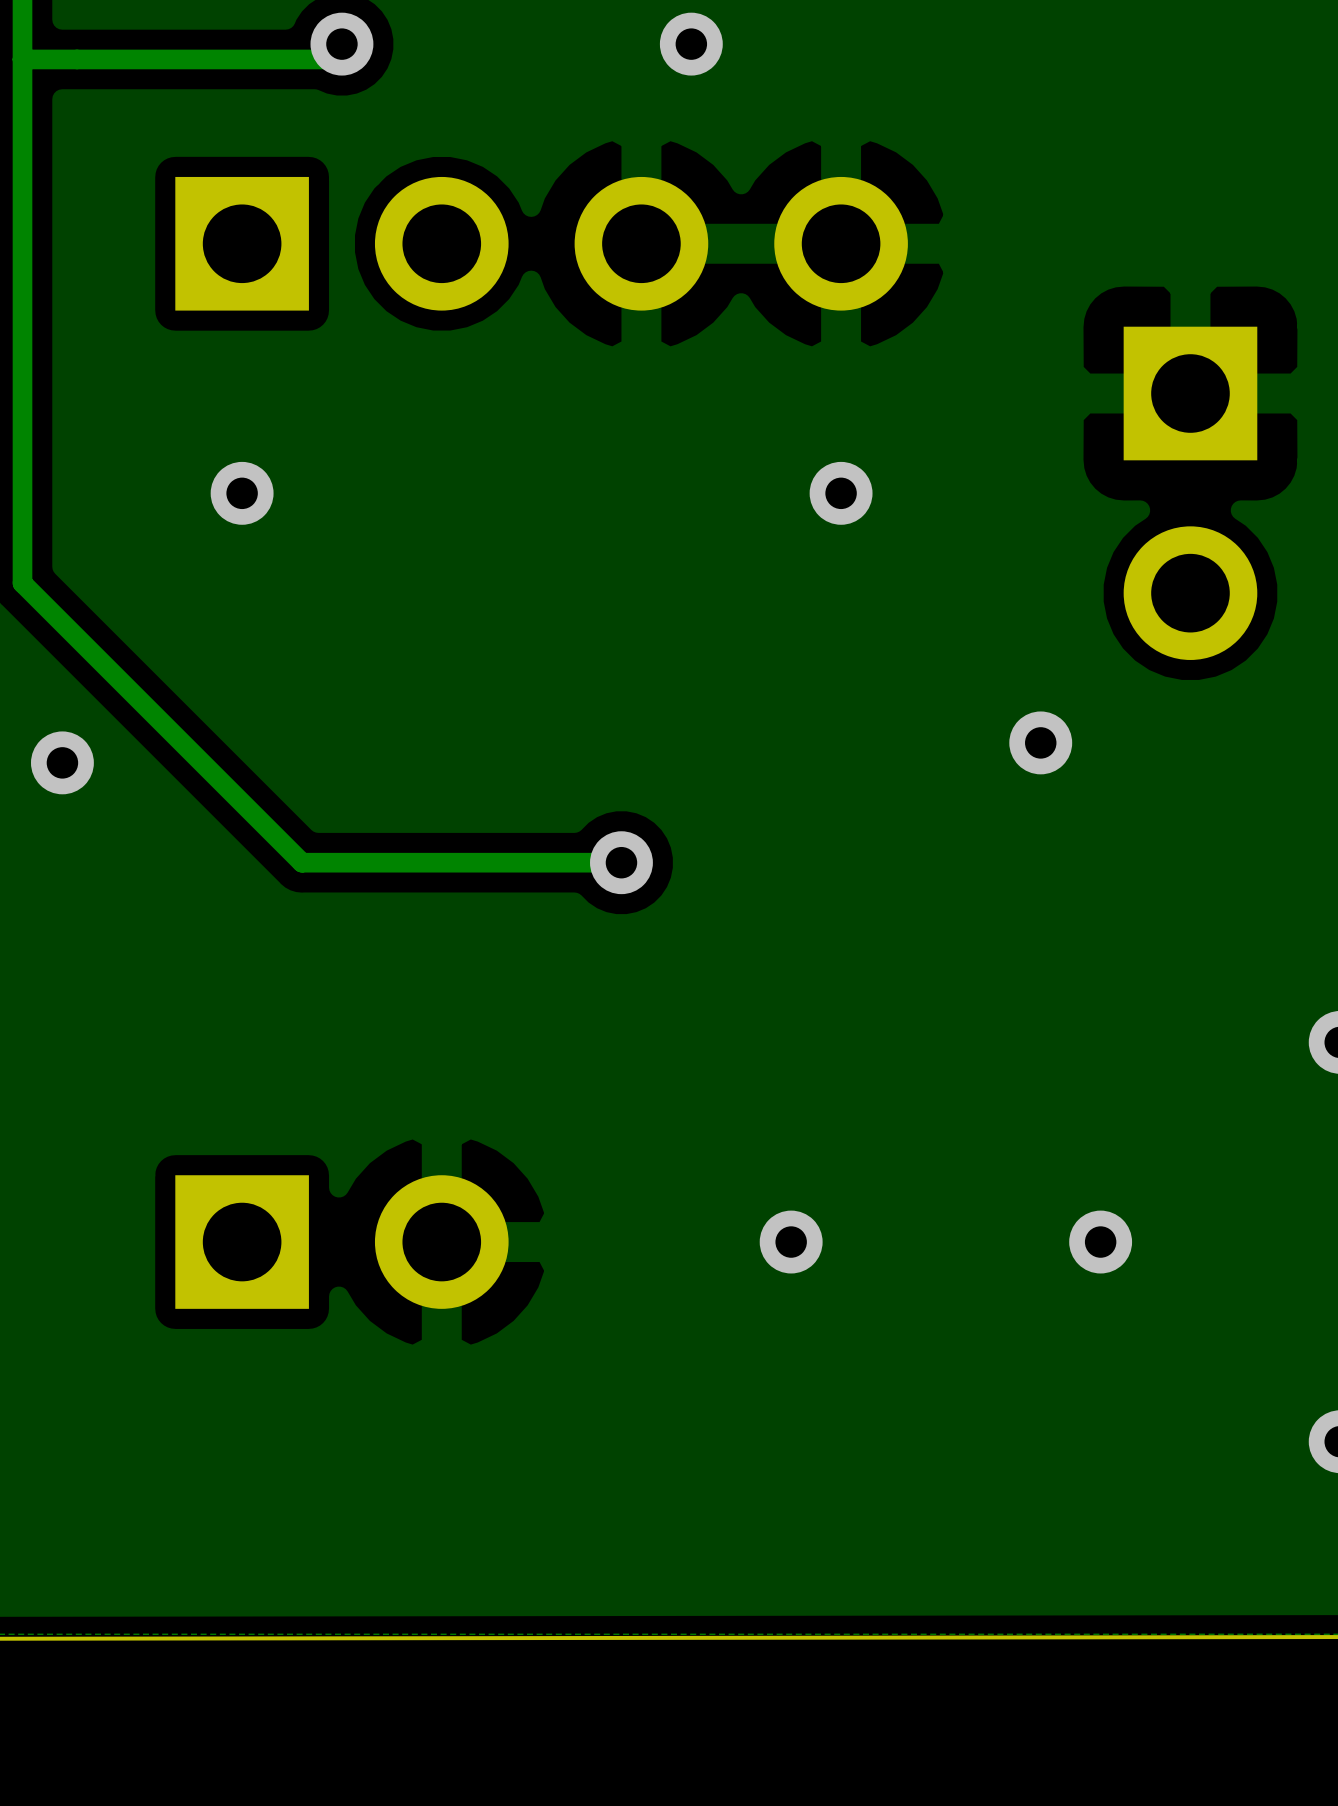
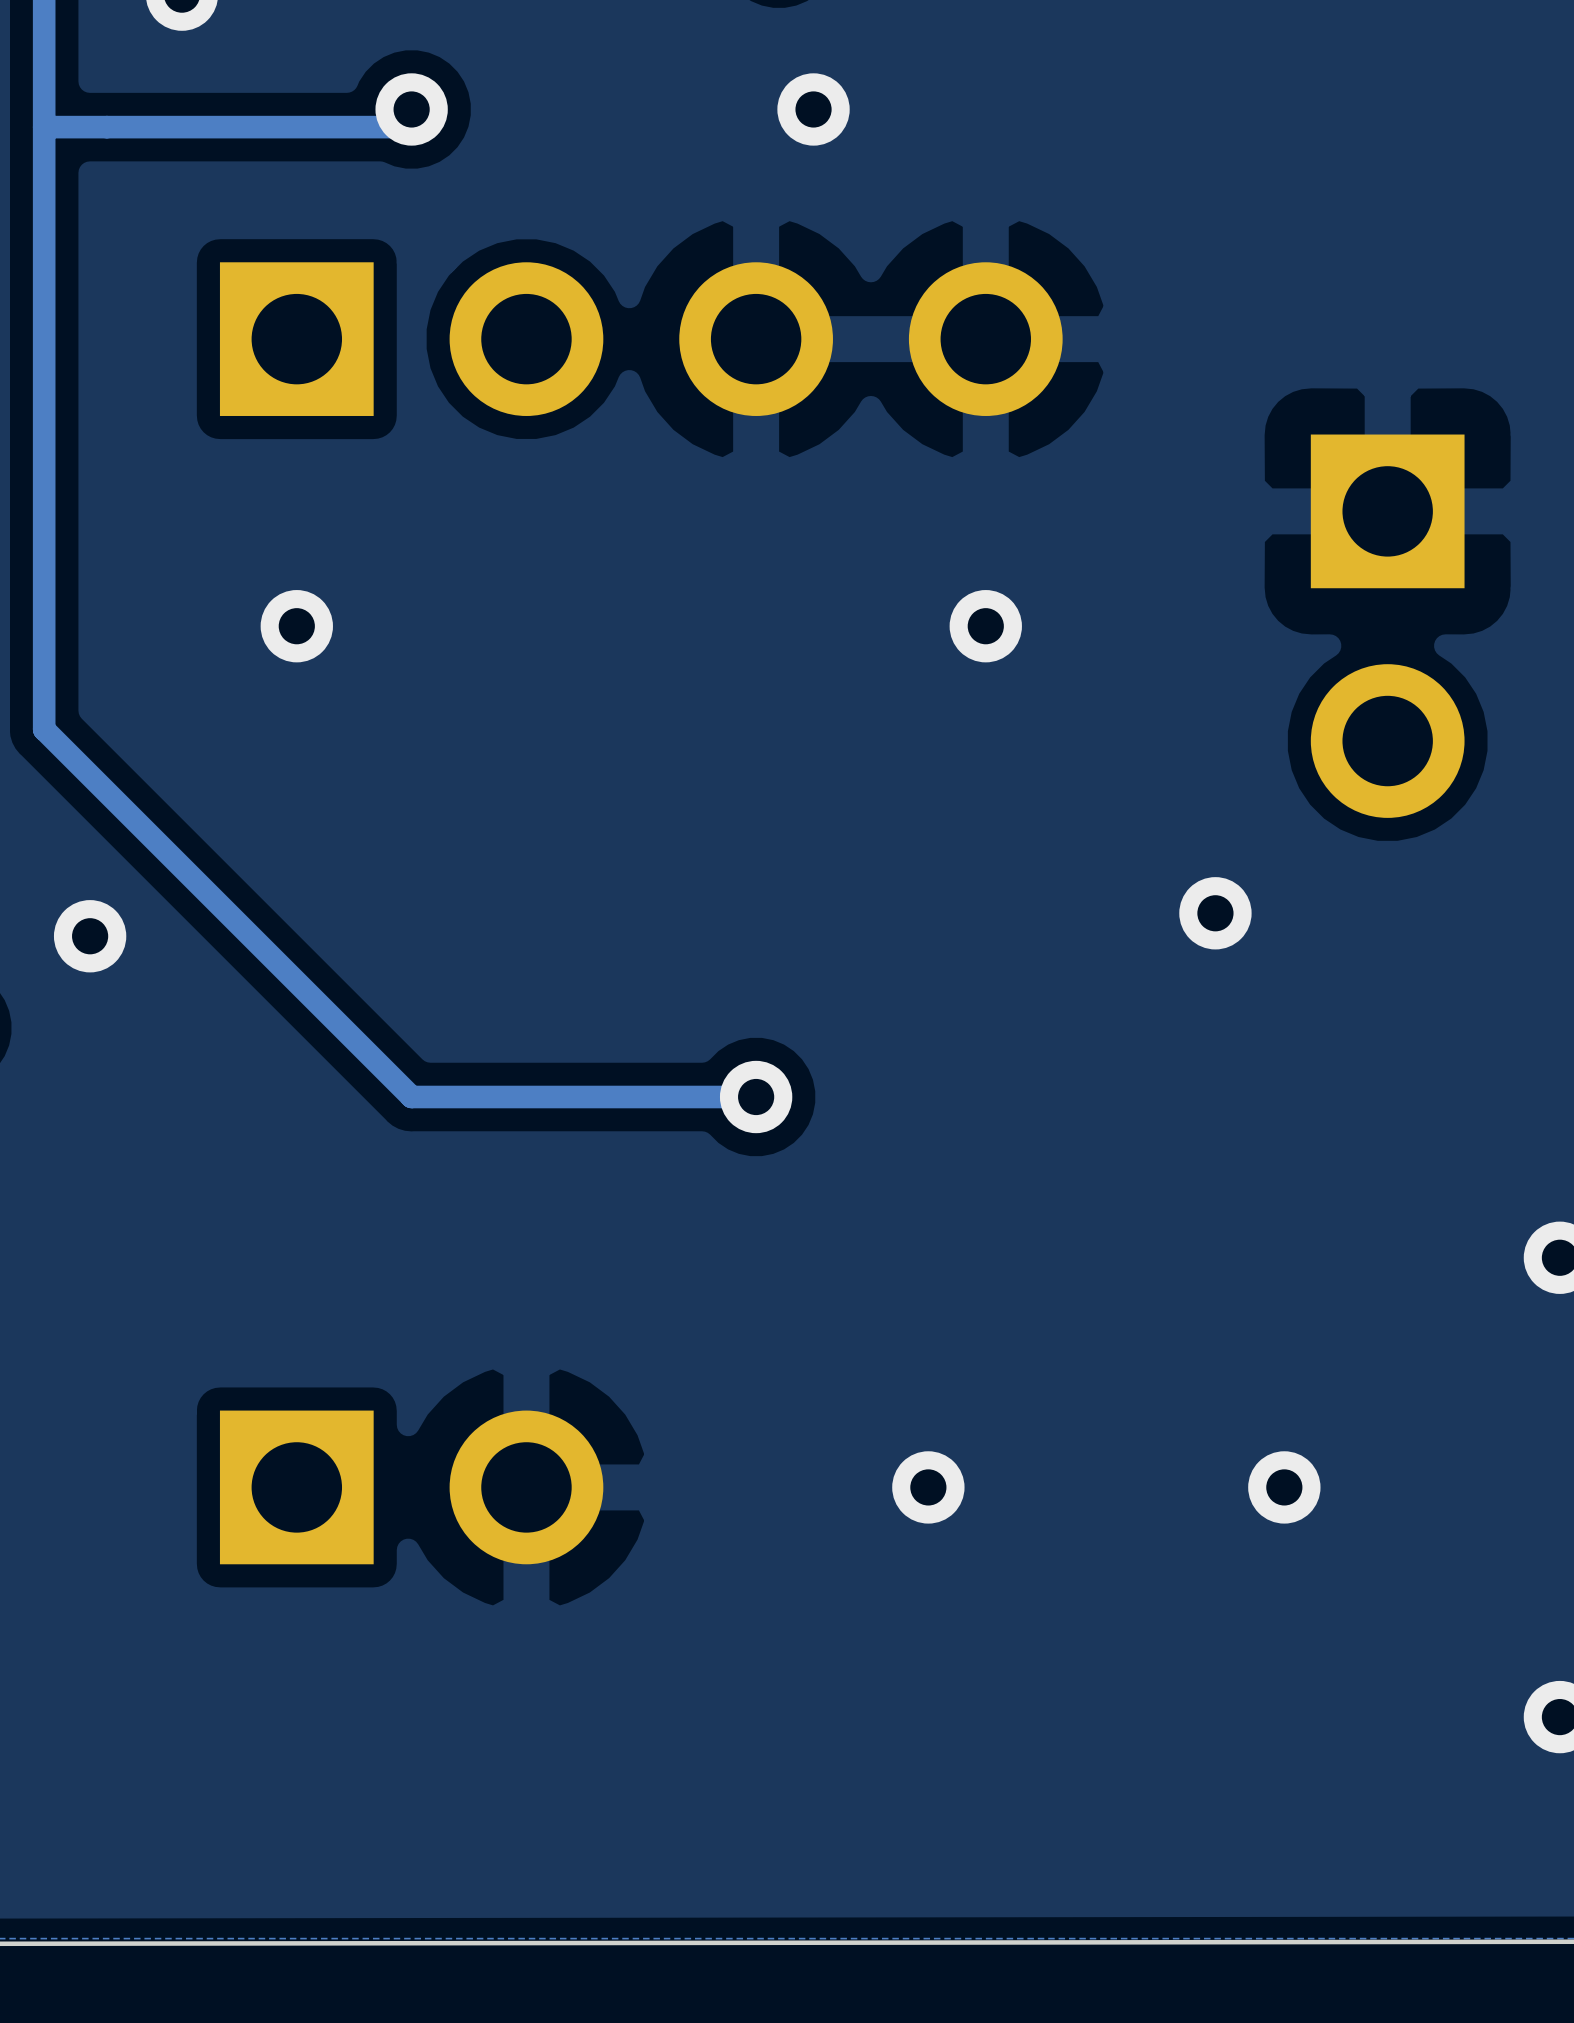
track: (621, 862) (302, 862) -> (756, 1097) (411, 1097) (365, 1051)
via position: (621, 862) -> (756, 1097)

